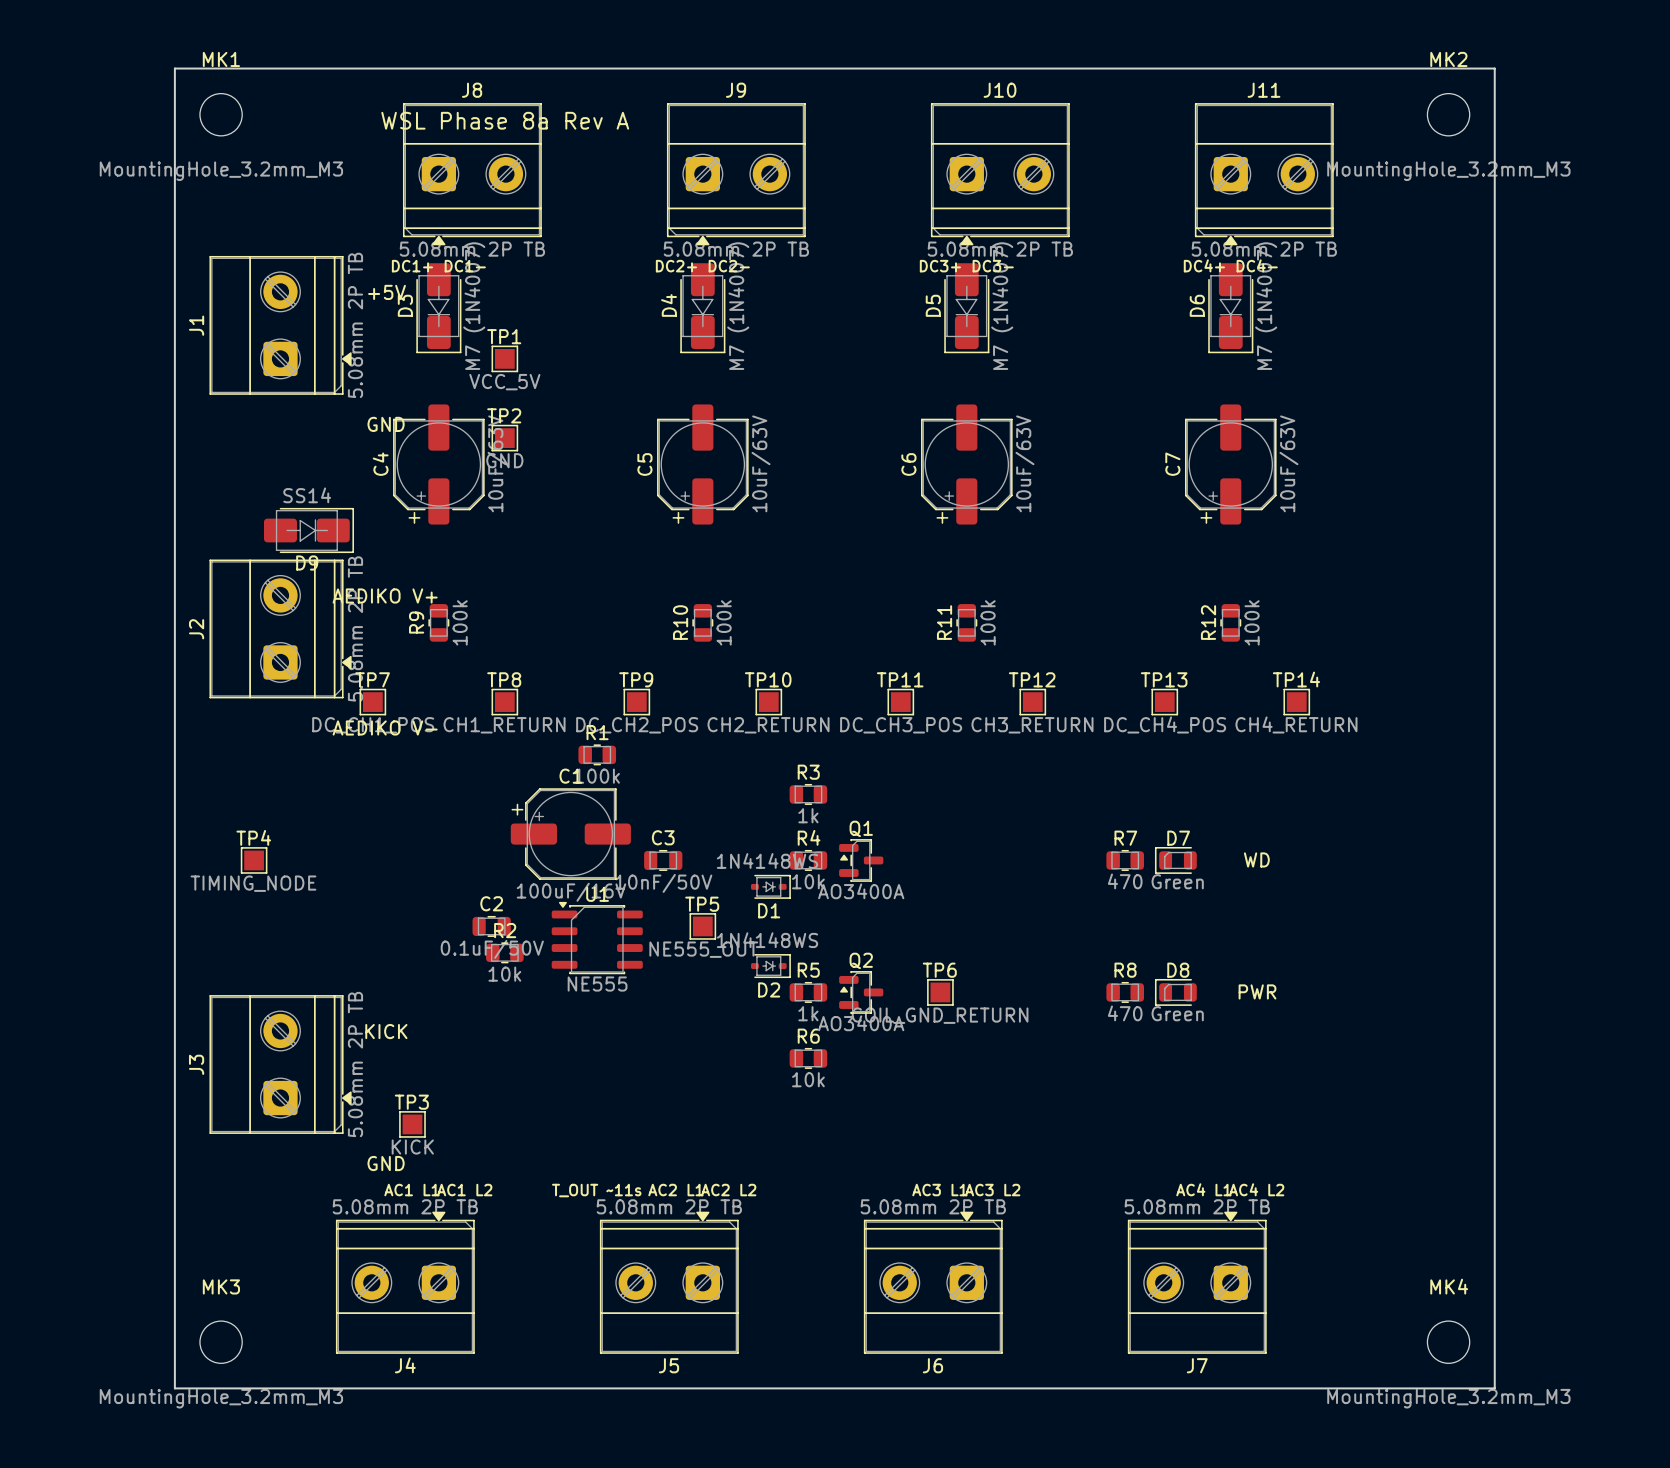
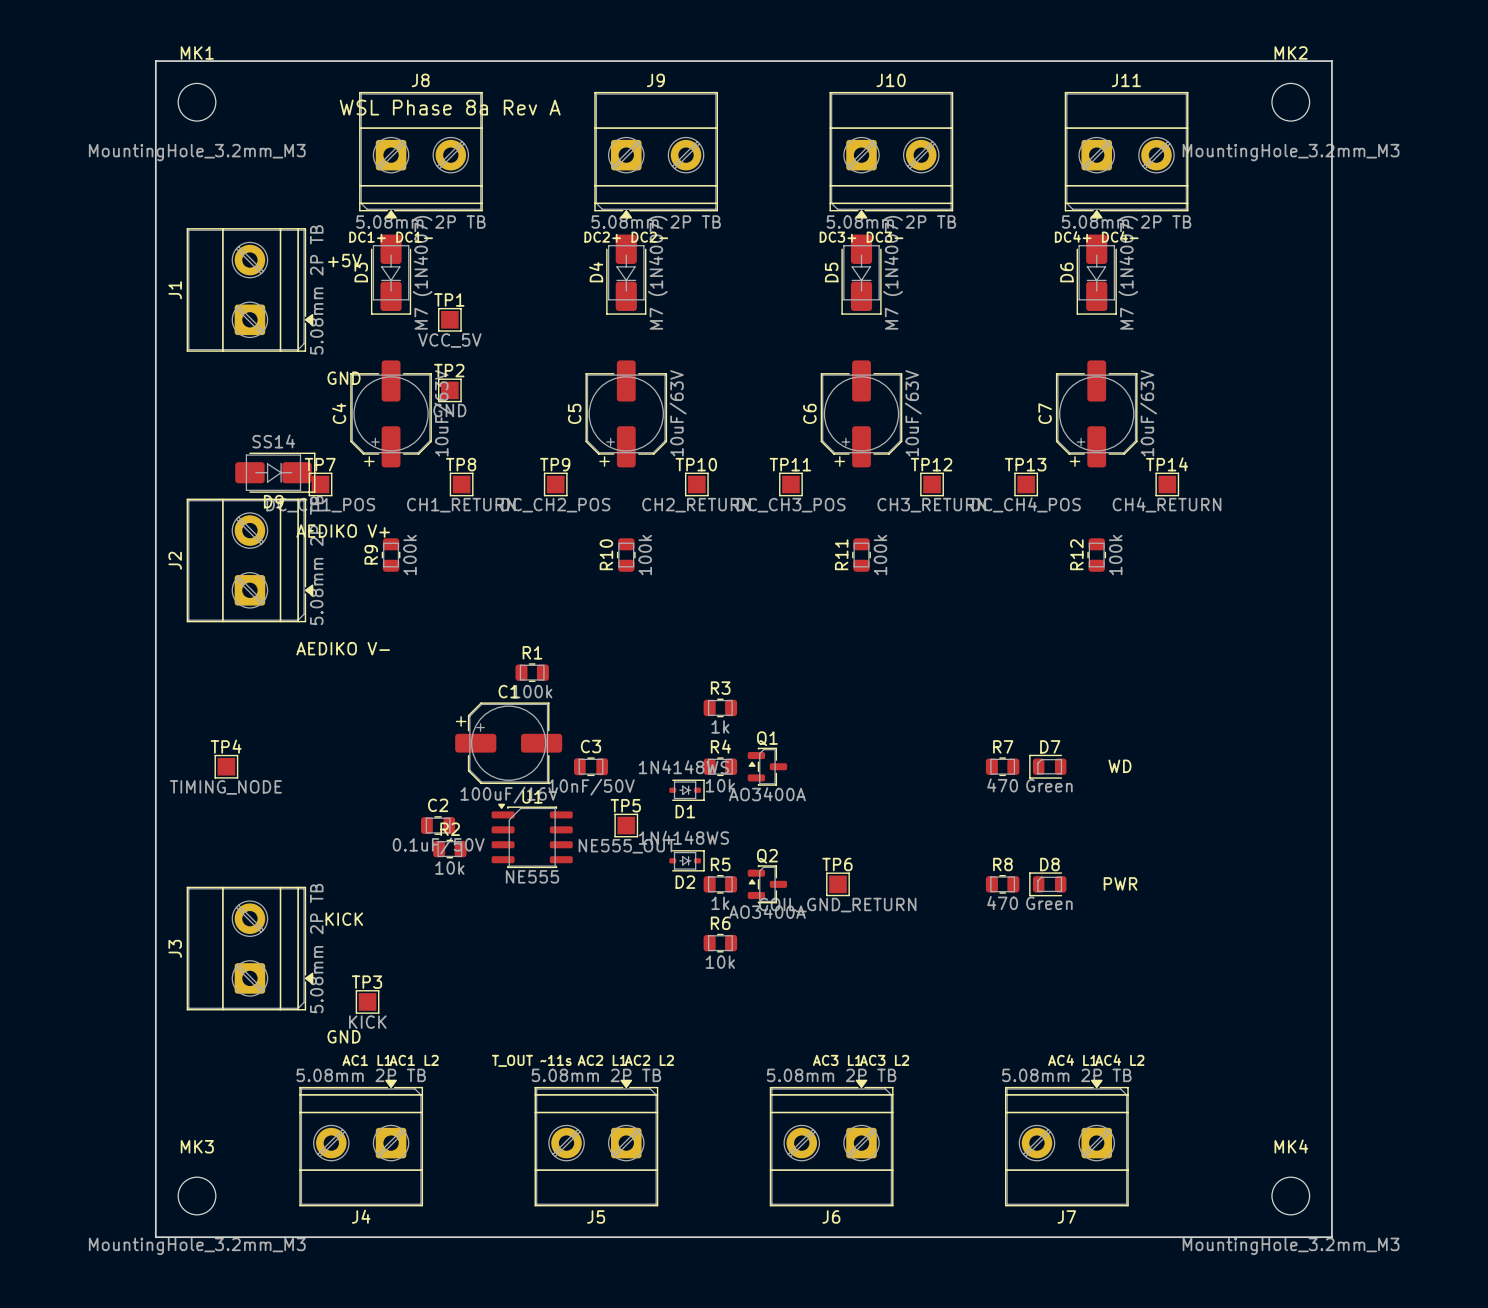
TP7 position: (372, 702) -> (320, 484)
TP8 position: (504, 702) -> (461, 484)
TP9 position: (636, 702) -> (555, 484)
TP10 position: (768, 702) -> (696, 484)
TP11 position: (900, 702) -> (790, 484)
TP12 position: (1032, 702) -> (932, 484)
TP13 position: (1164, 702) -> (1026, 484)
TP14 position: (1296, 702) -> (1167, 484)

